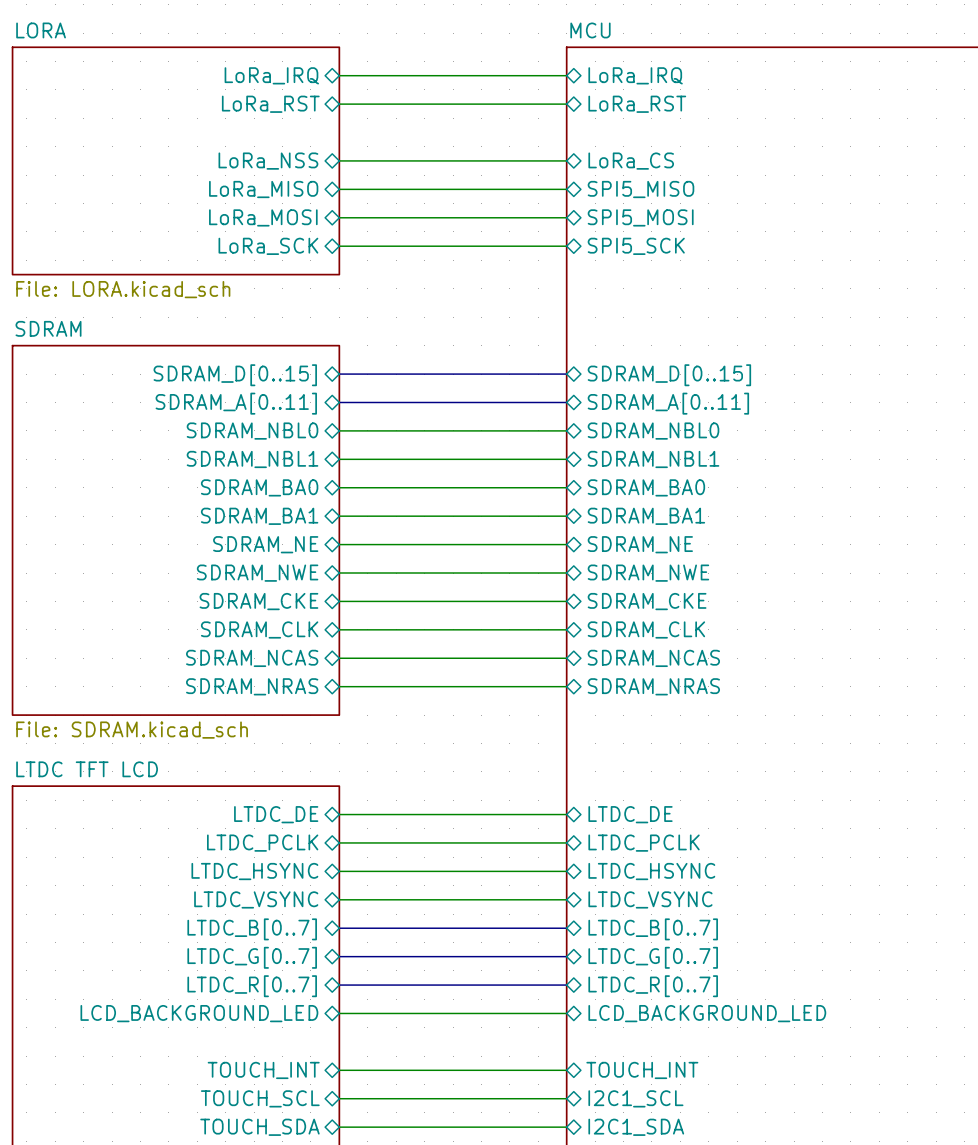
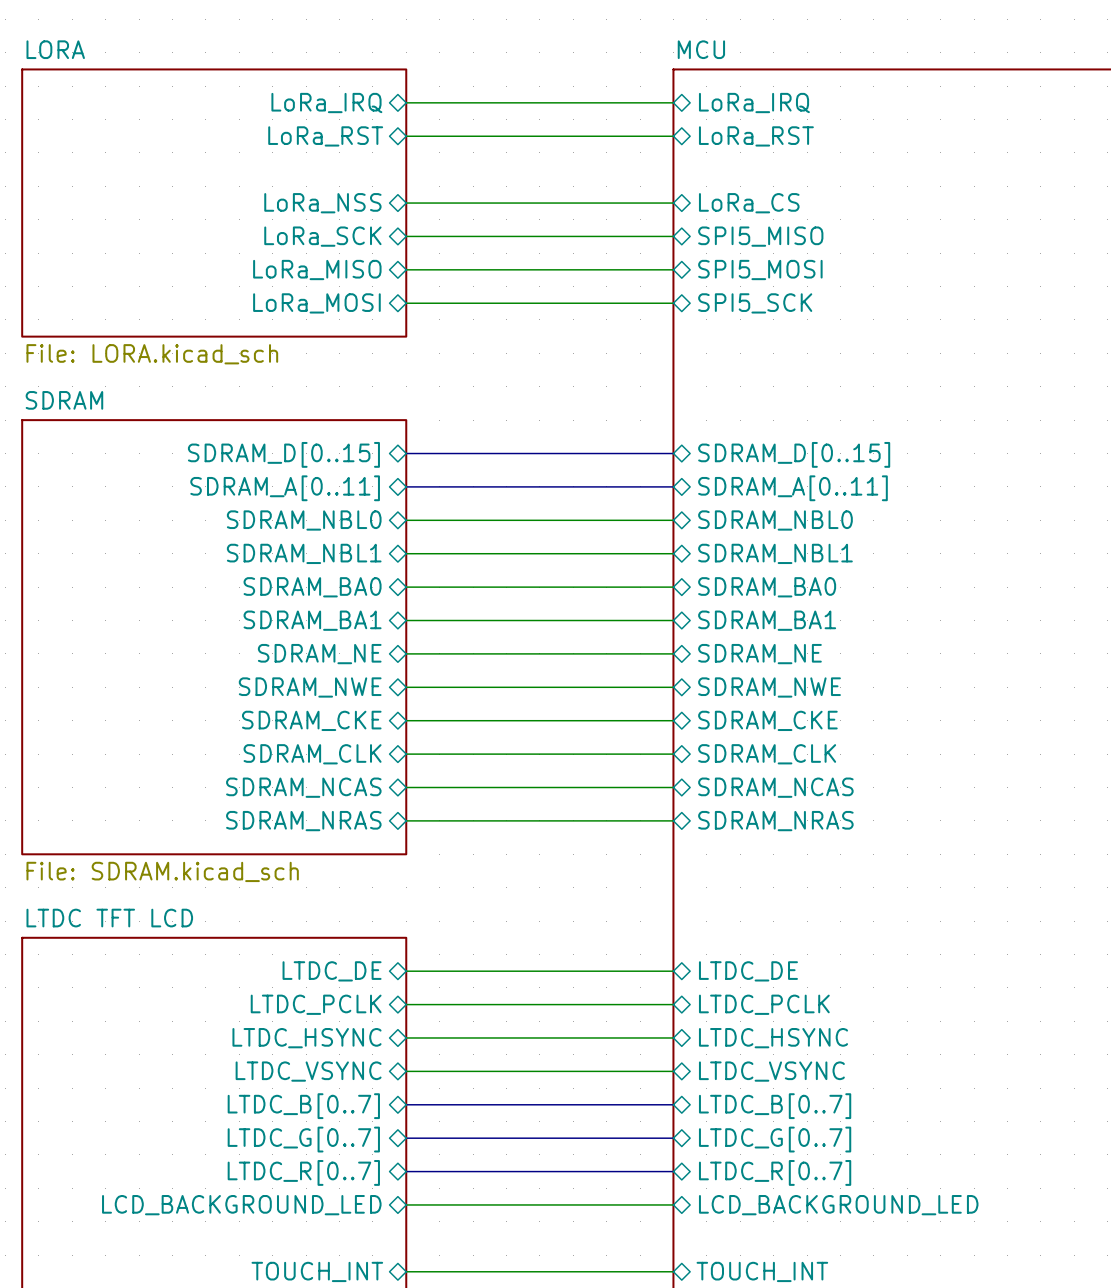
sheet pin: LoRa_MISO (263, 189) -> LoRa_SCK (322, 236)
sheet pin: LoRa_MOSI (263, 217) -> LoRa_MISO (317, 270)
sheet pin: LoRa_SCK (268, 246) -> LoRa_MOSI (316, 303)

